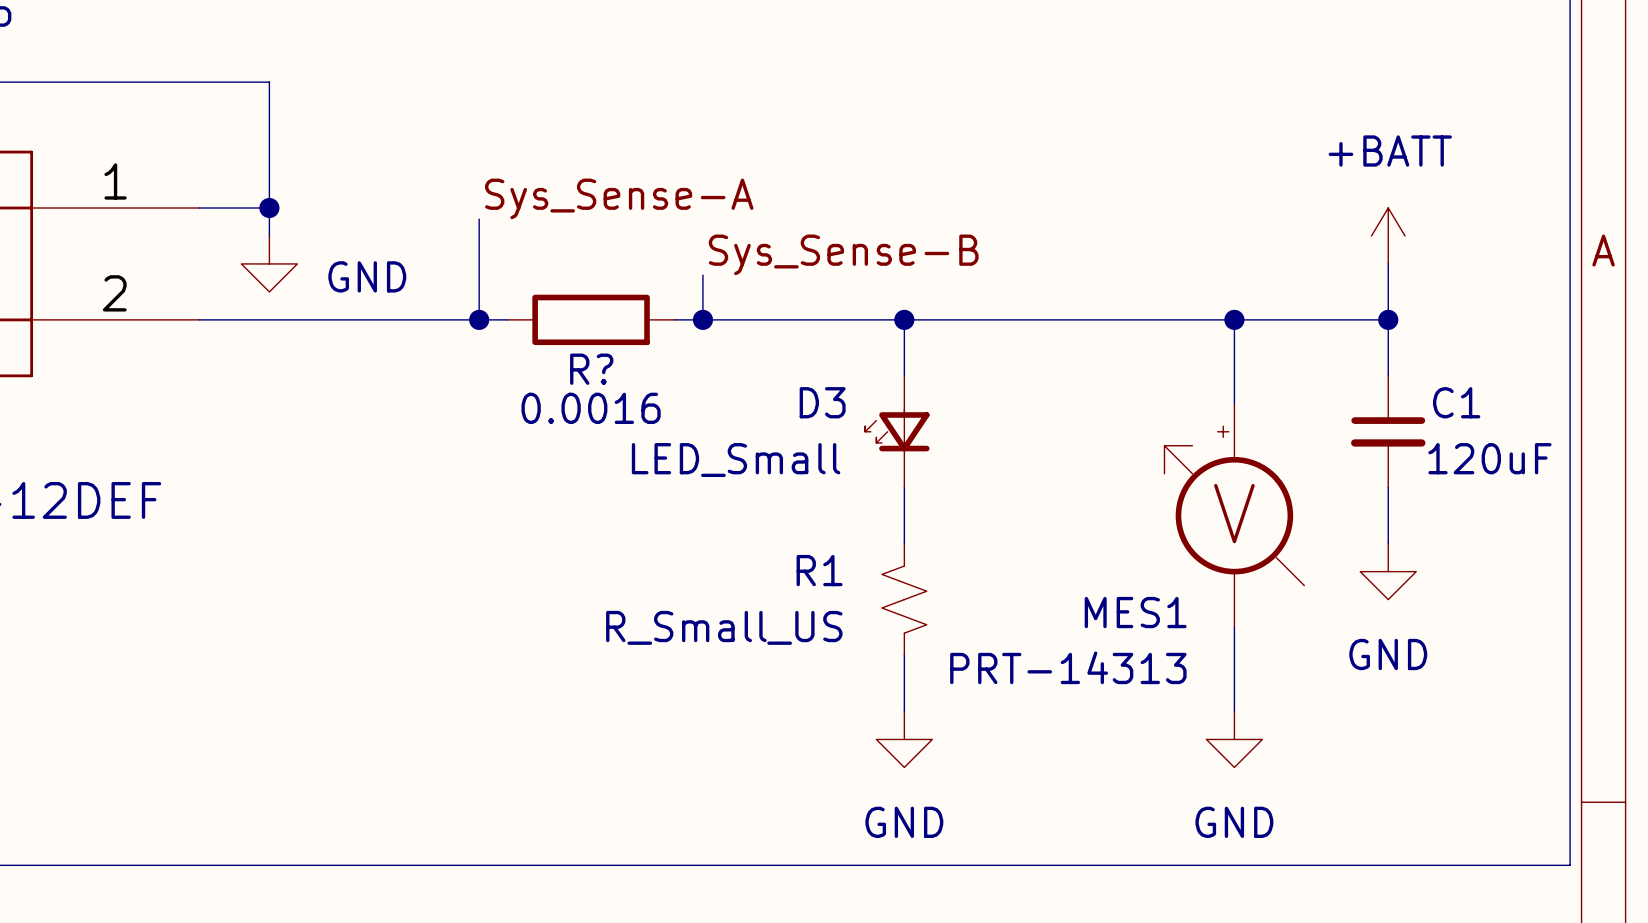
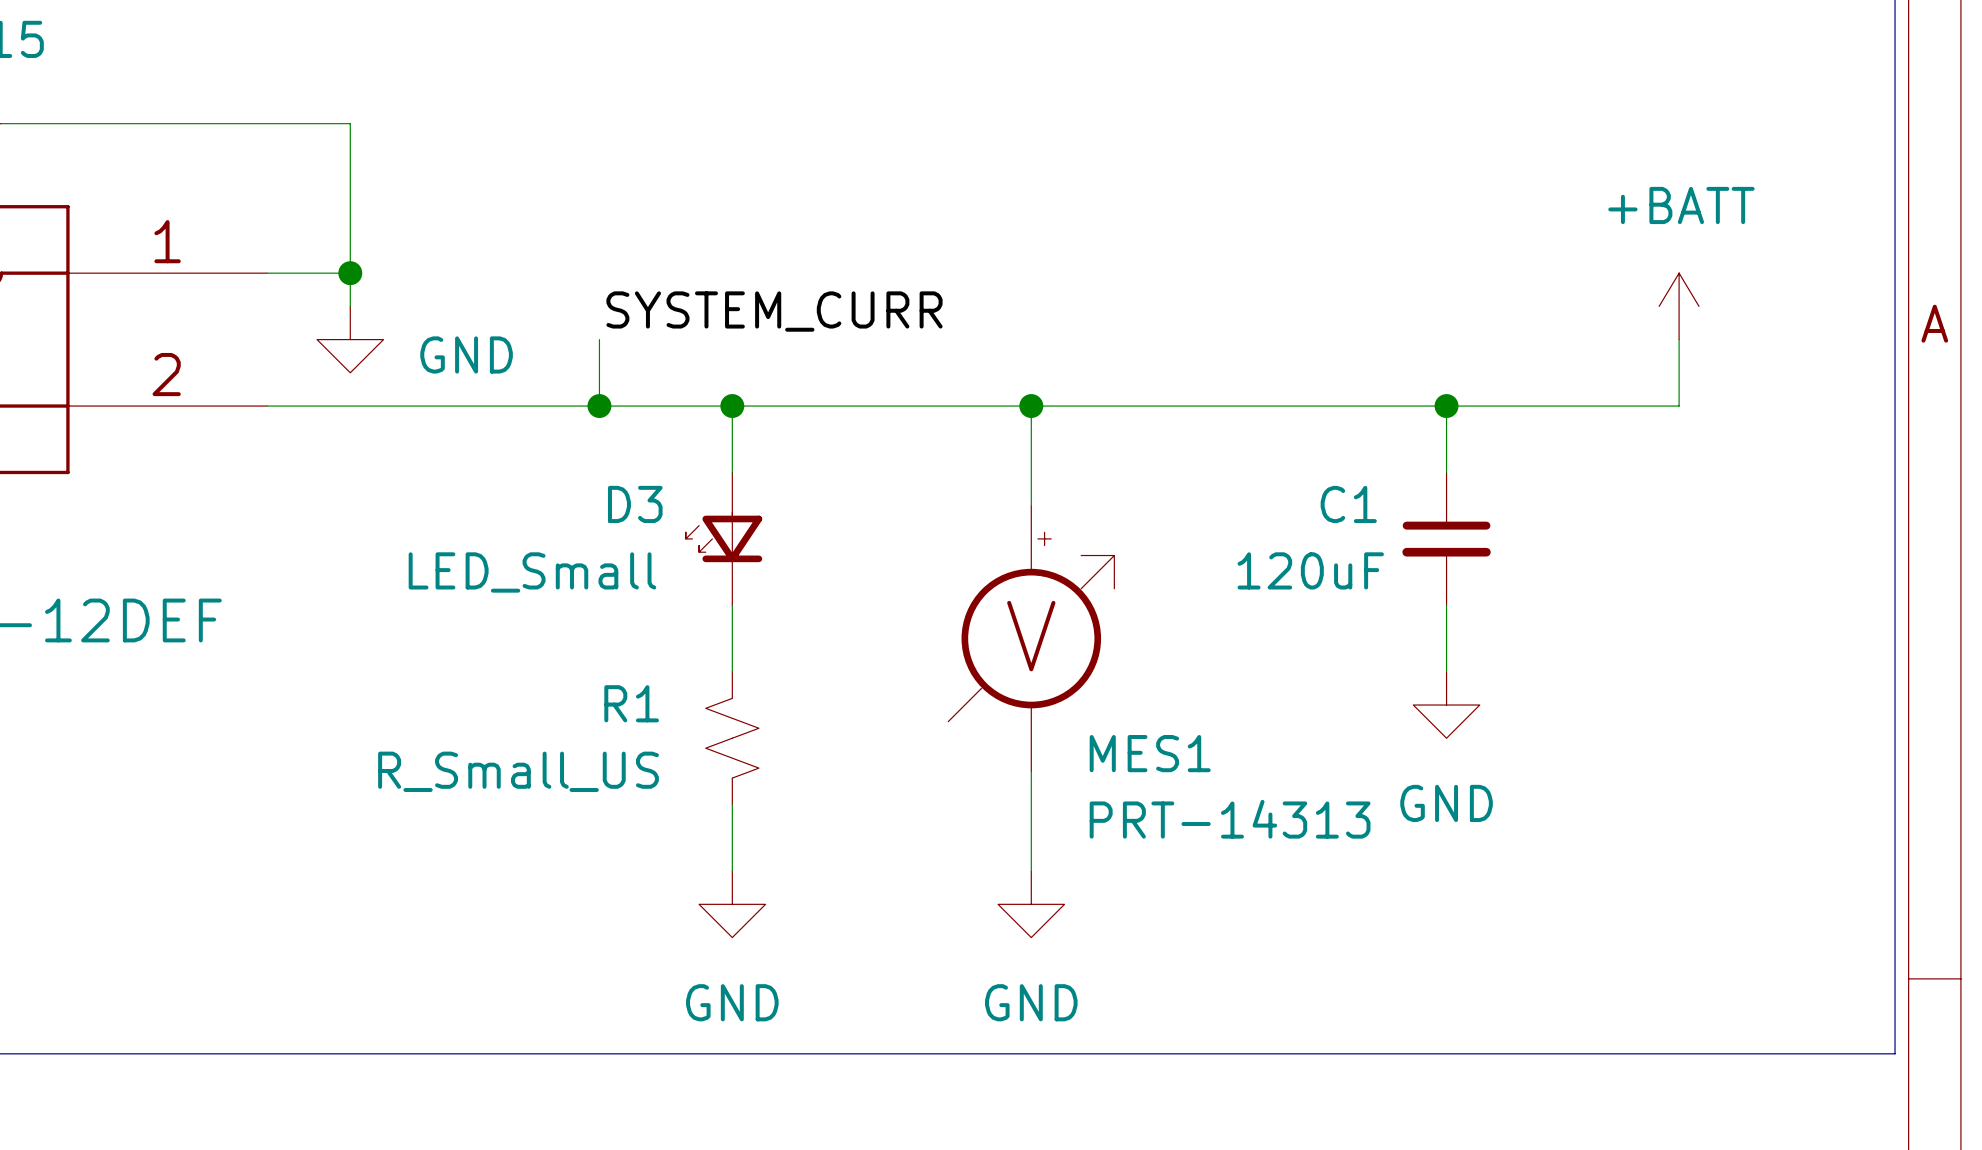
label: Sys_Sense-A (619, 198) -> none
wire: (479, 219) (479, 263) -> none
label: none -> SYSTEM_CURR (774, 311)
label: Sys_Sense-B (843, 254) -> none
wire: (702, 275) (702, 319) -> none
wire: none -> (632, 406) (831, 406)
junction: none -> (732, 406)
R?: 0.0016 (591, 319) -> none
junction: (702, 319) -> none
wire: (904, 319) (904, 375) -> (732, 406) (732, 472)
junction position: (904, 319) -> (1031, 406)
wire: (1234, 319) (1234, 403) -> (1031, 406) (1031, 505)
junction position: (1234, 319) -> (1446, 406)
wire: (1388, 319) (1388, 375) -> (1446, 406) (1446, 472)
junction: (1388, 319) -> none
C1 name position: C1 (1456, 402) -> C1 (1348, 504)
D3 position: (897, 431) -> (724, 538)
C1 position: (1388, 431) -> (1446, 538)
C1 value position: 120uF (1489, 458) -> 120uF (1310, 570)
wire: (904, 487) (904, 543) -> (732, 605) (732, 671)
wire: (1388, 487) (1388, 543) -> (1446, 605) (1446, 671)
MES1 flip: as is (1234, 505) -> left-right (1031, 626)
MES1 position: (1234, 515) -> (1031, 638)
power symbol: none -> GND (1446, 705)
power symbol: GND (1388, 571) -> none
R1 position: (904, 599) -> (732, 738)
wire: (1234, 627) (1234, 711) -> (1031, 771) (1031, 871)
wire: (904, 655) (904, 711) -> (732, 804) (732, 871)
power symbol: none -> GND (732, 904)
power symbol position: GND (904, 739) -> GND (1031, 904)
power symbol: GND (1234, 739) -> none

